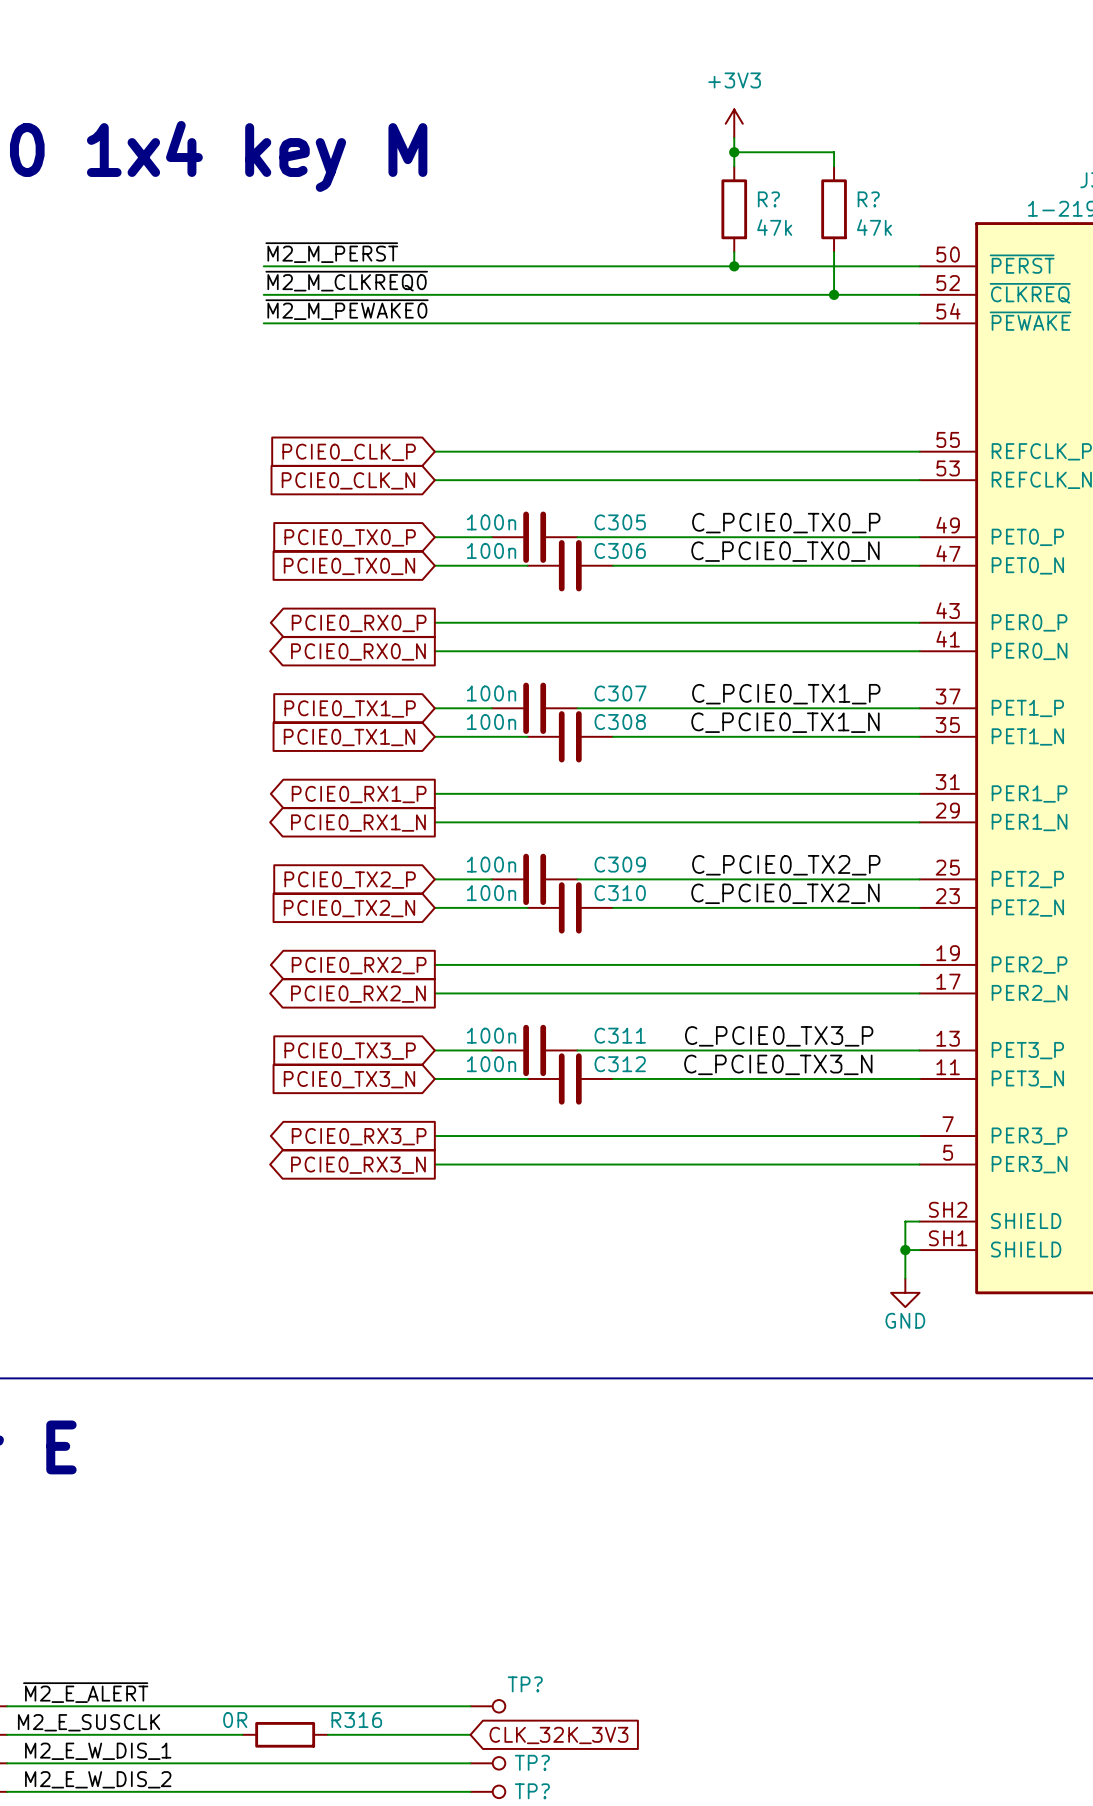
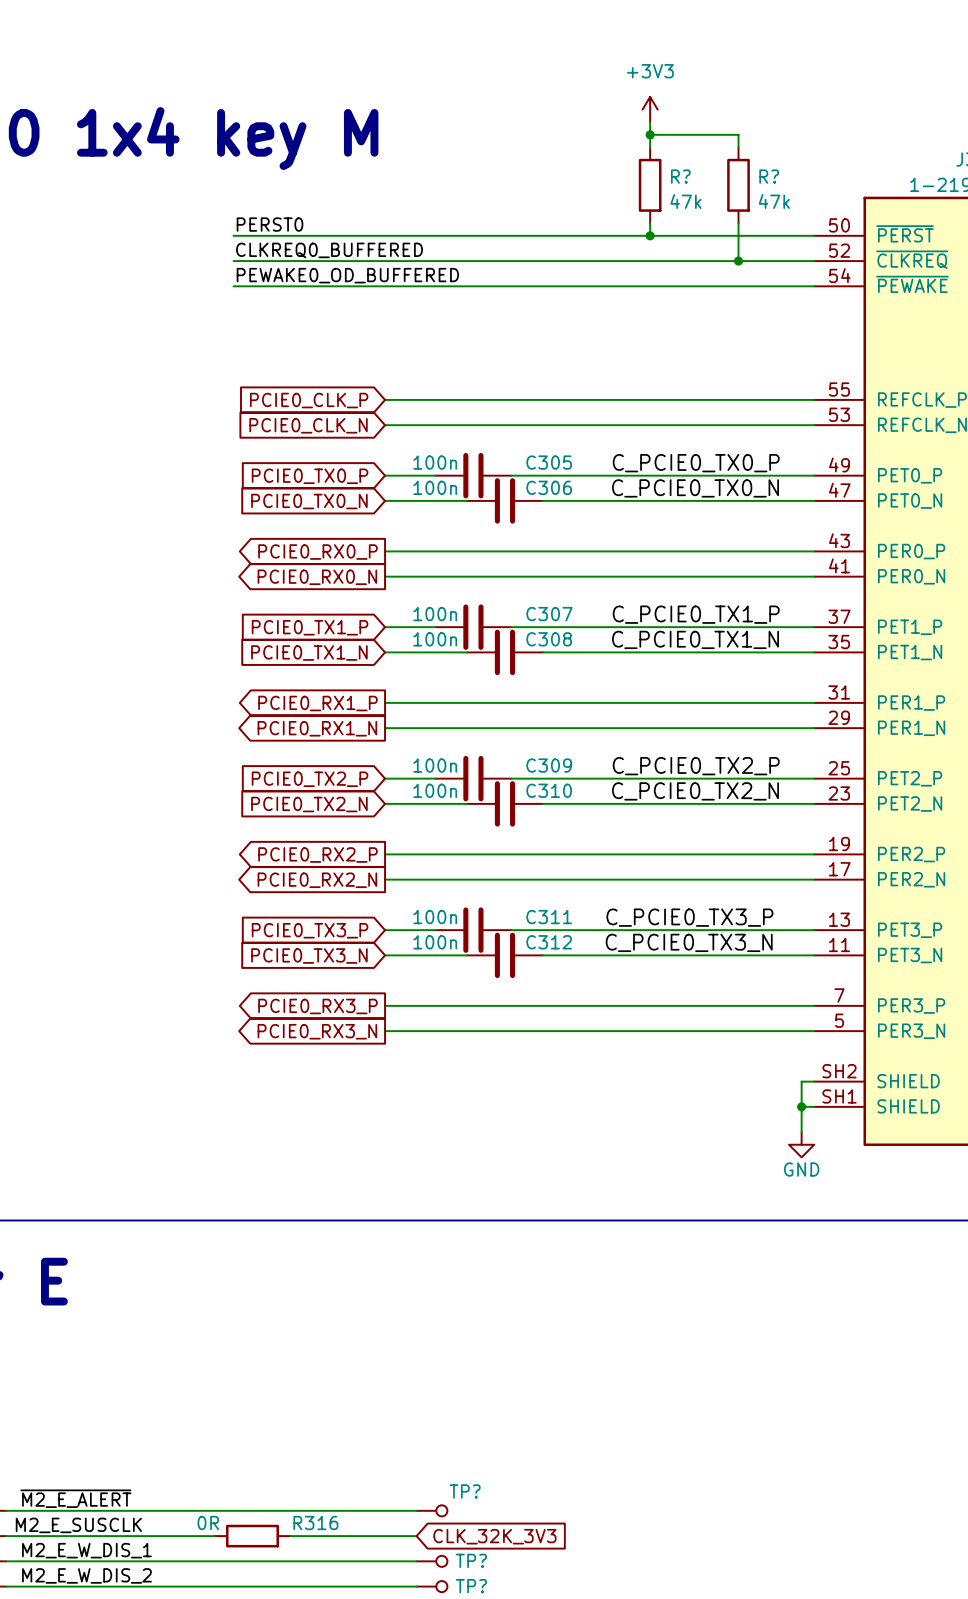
label: ~{M2_M_PERST} (331, 252) -> PERST0 (270, 224)
label: ~{M2_M_CLKREQ0} (346, 281) -> CLKREQ0_BUFFERED (329, 250)
label: ~{M2_M_PEWAKE0} (347, 309) -> PEWAKE0_OD_BUFFERED (347, 275)

